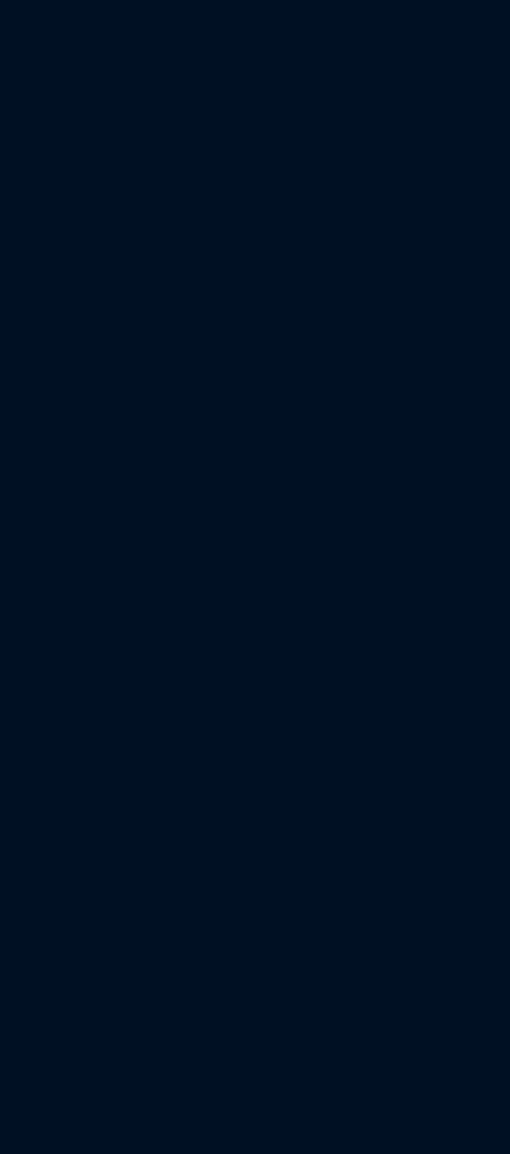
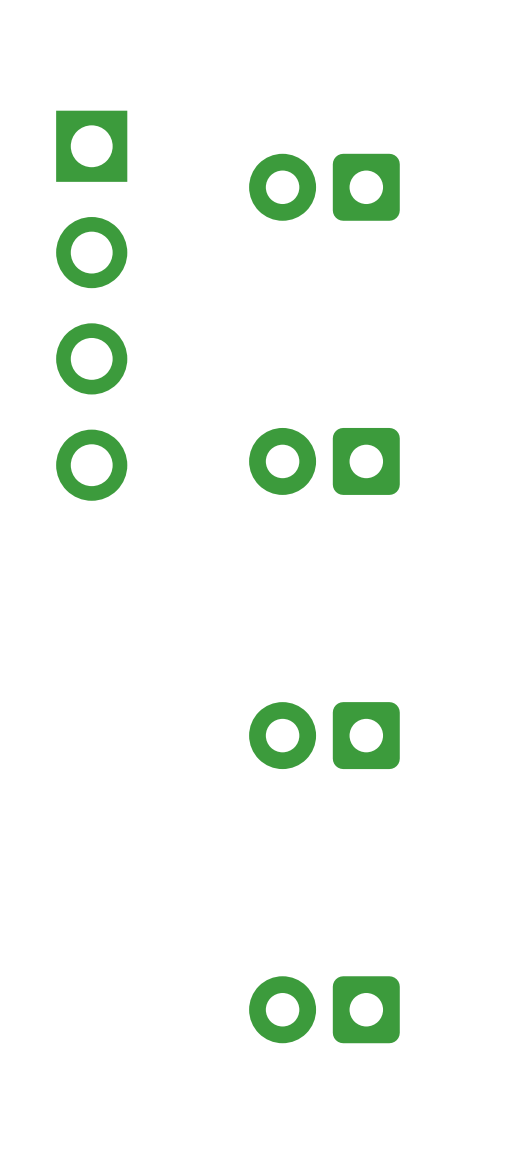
part: none -> (324, 187)
part: none -> (91, 305)
part: none -> (324, 461)
part: none -> (324, 735)
part: none -> (324, 1009)

